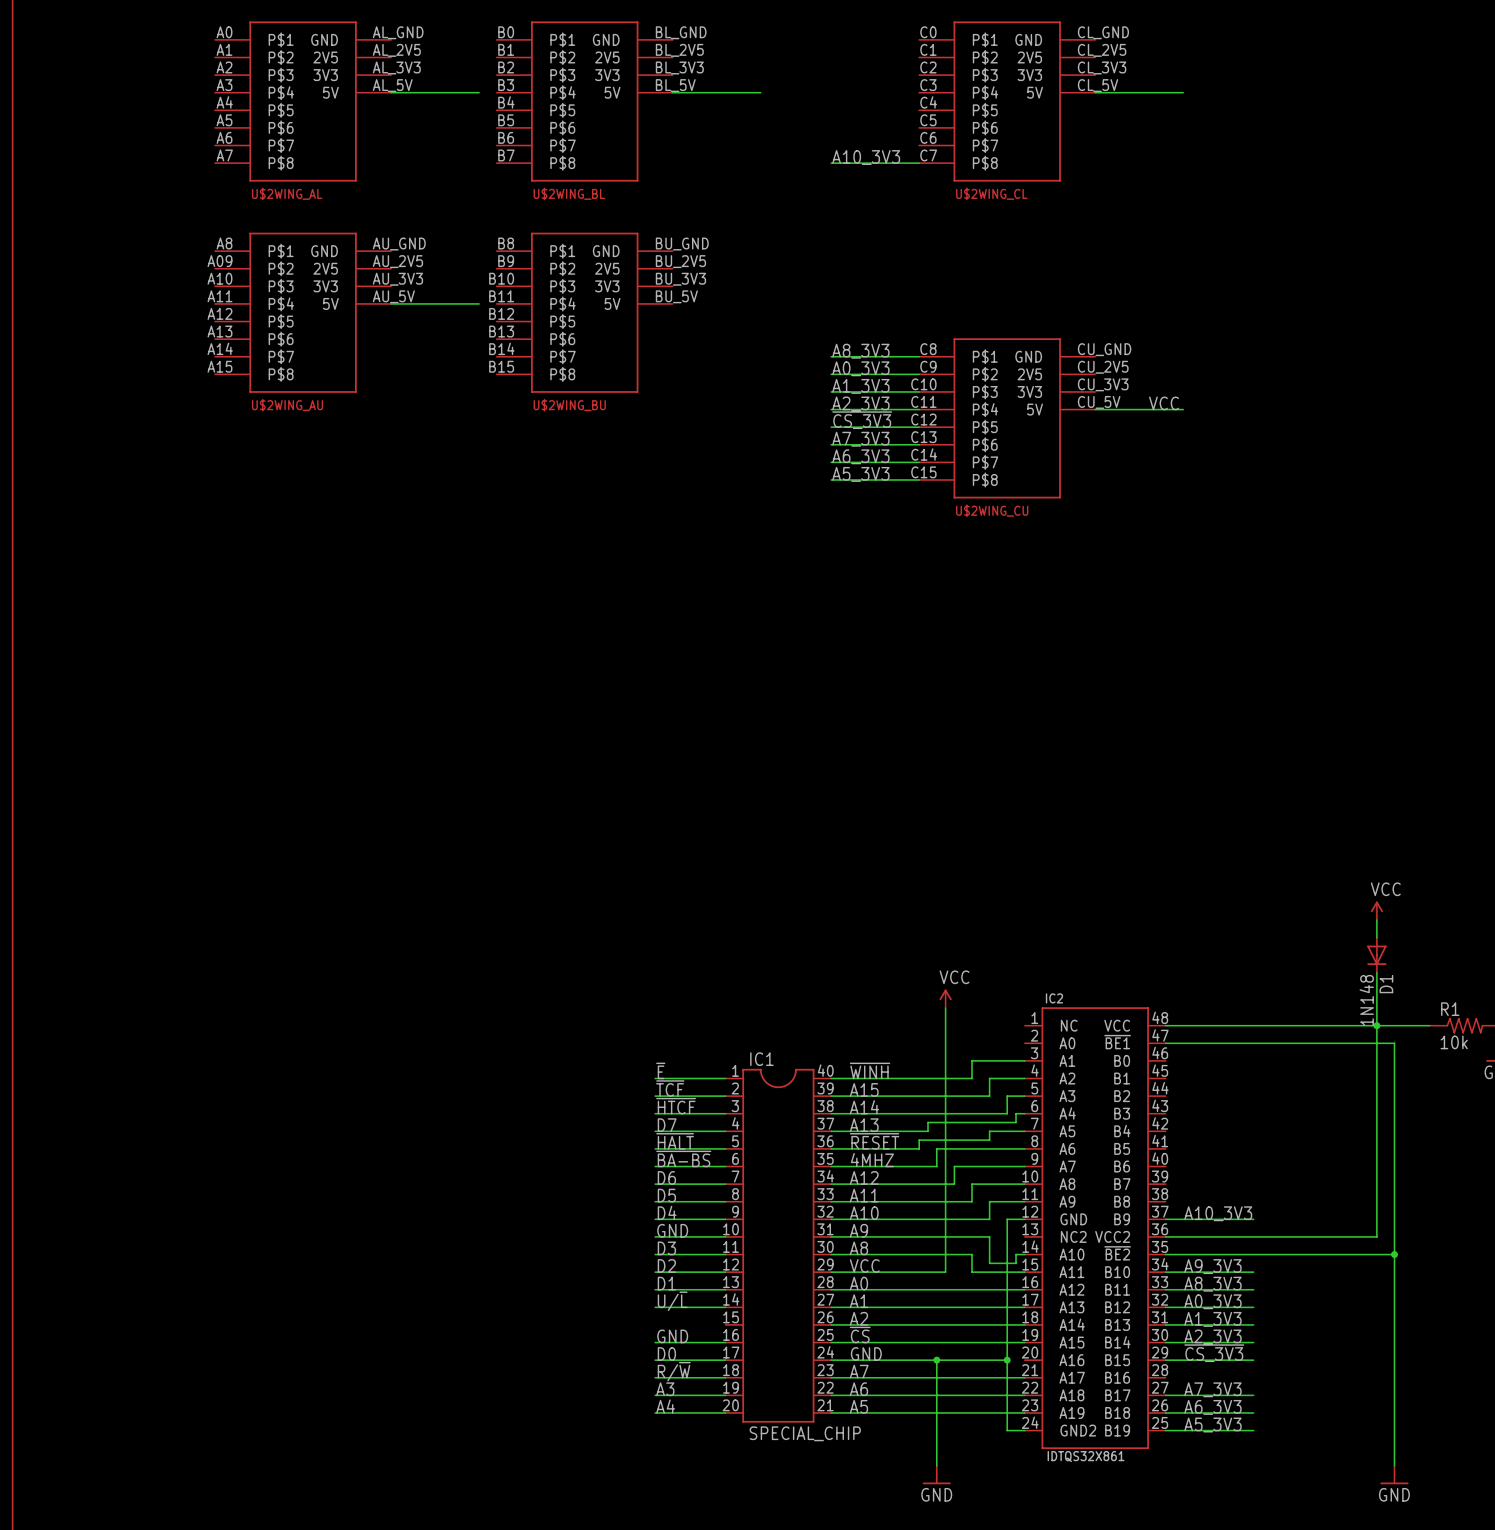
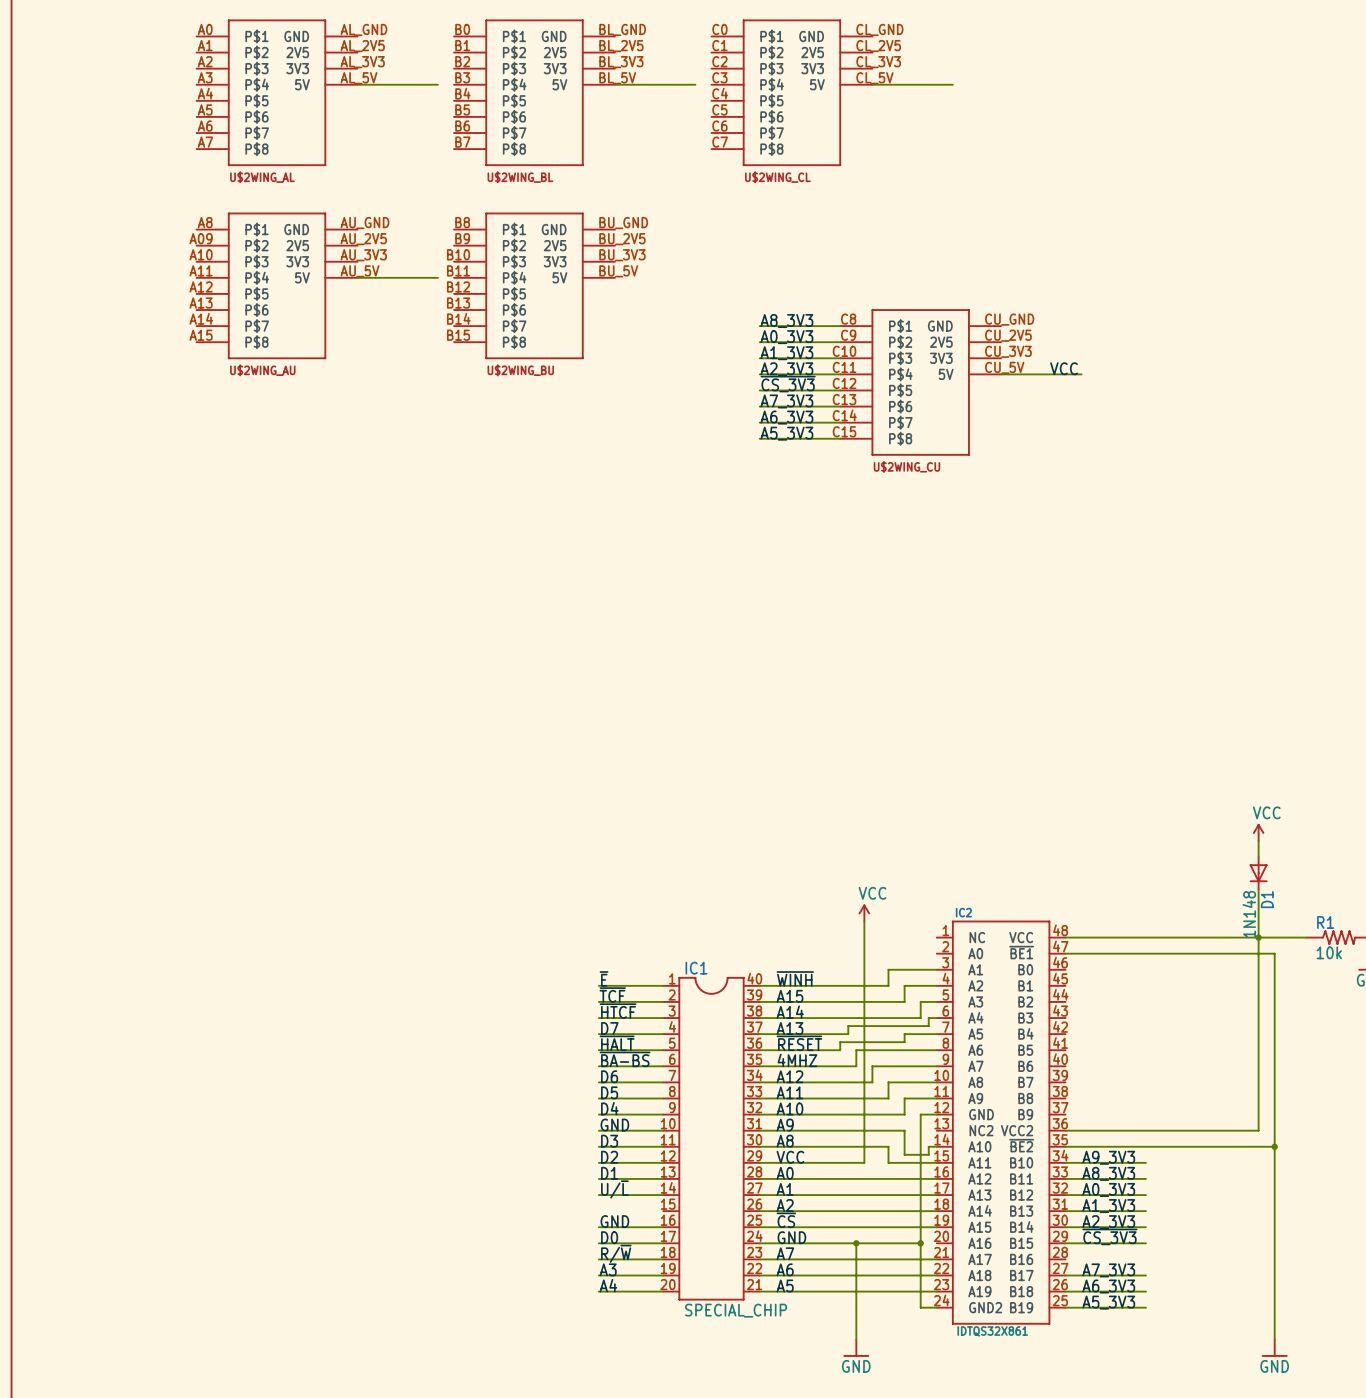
wire: (1095, 92) (1183, 92) -> (872, 84) (952, 84)
U$2WING_CL position: (1007, 101) -> (791, 92)
label: A10_3V3 (866, 157) -> none
wire: (831, 163) (919, 163) -> none
label: A10_3V3 (1218, 1213) -> none
wire: (1165, 1219) (1253, 1219) -> none

